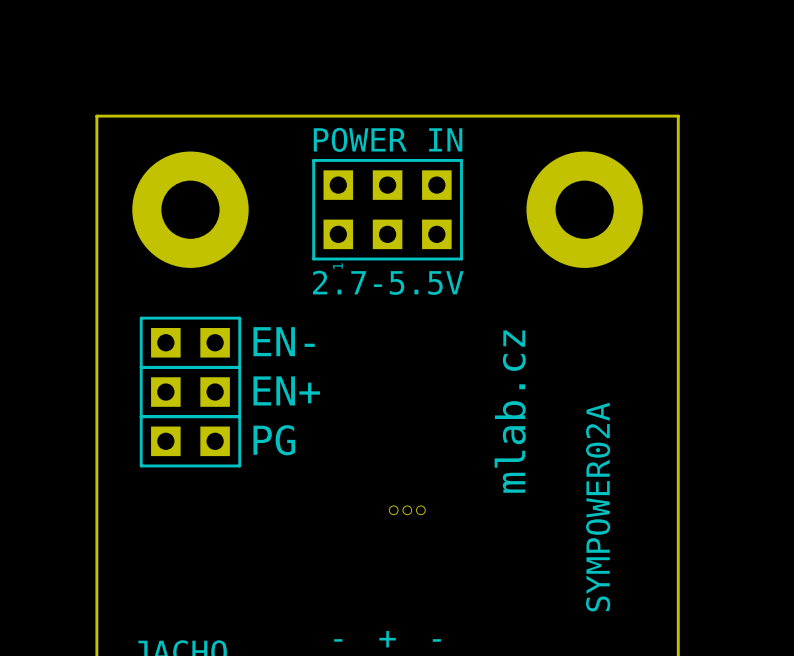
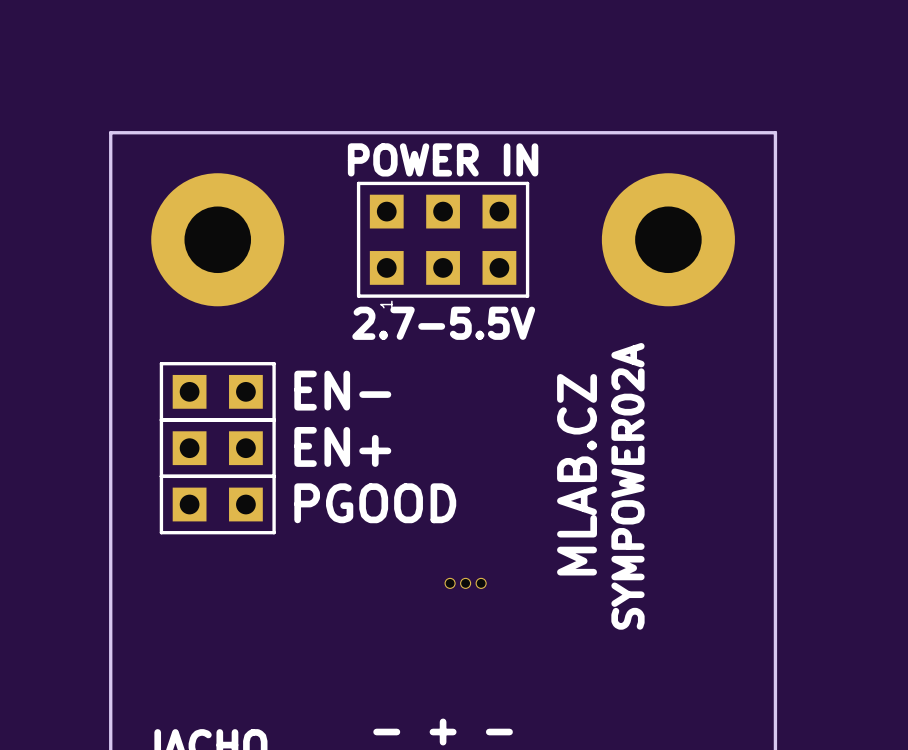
text: mlab.cz (510, 411) -> MLAB.CZ (577, 474)
text: PG (274, 440) -> PGOOD (375, 503)
text position: SYMPOWER02A (598, 507) -> SYMPOWER02A (627, 486)

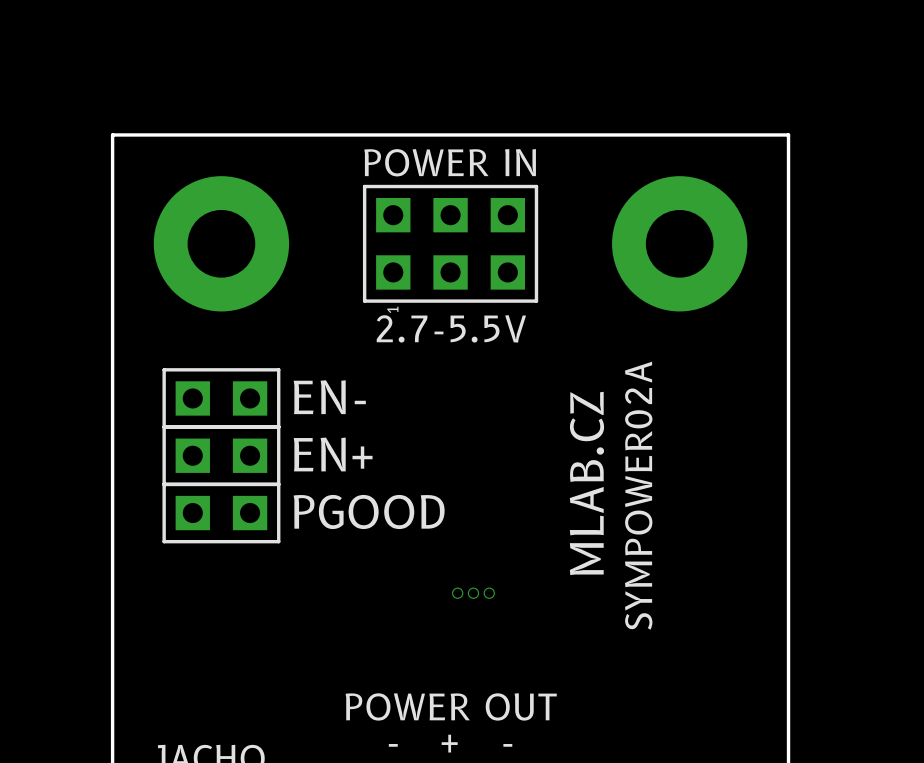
text: none -> POWER OUT (451, 706)

